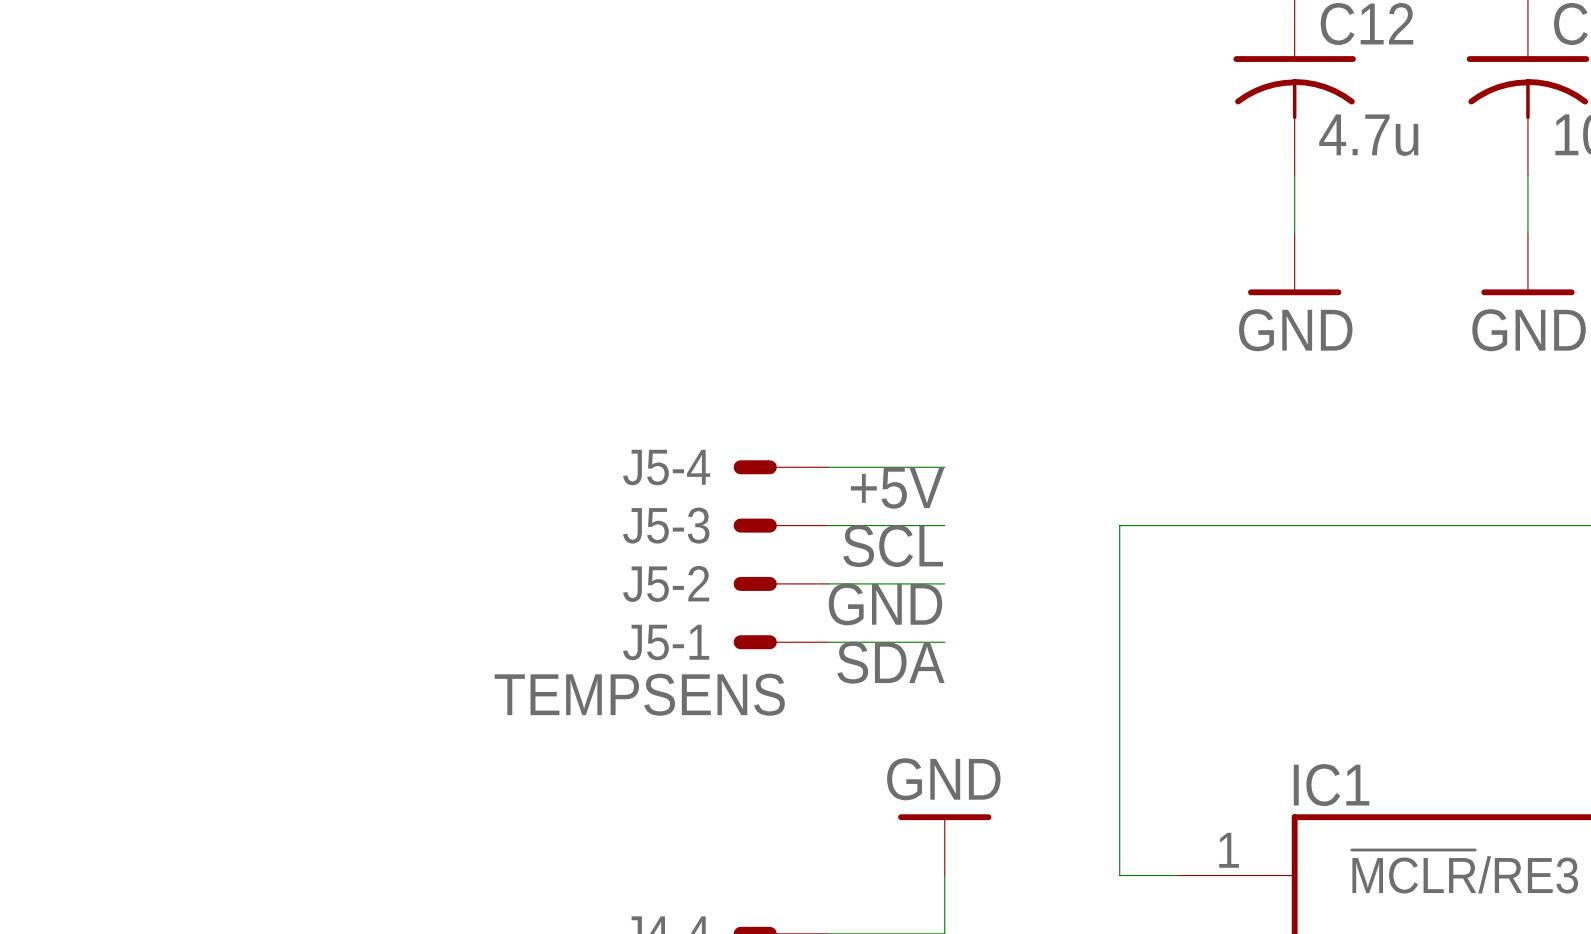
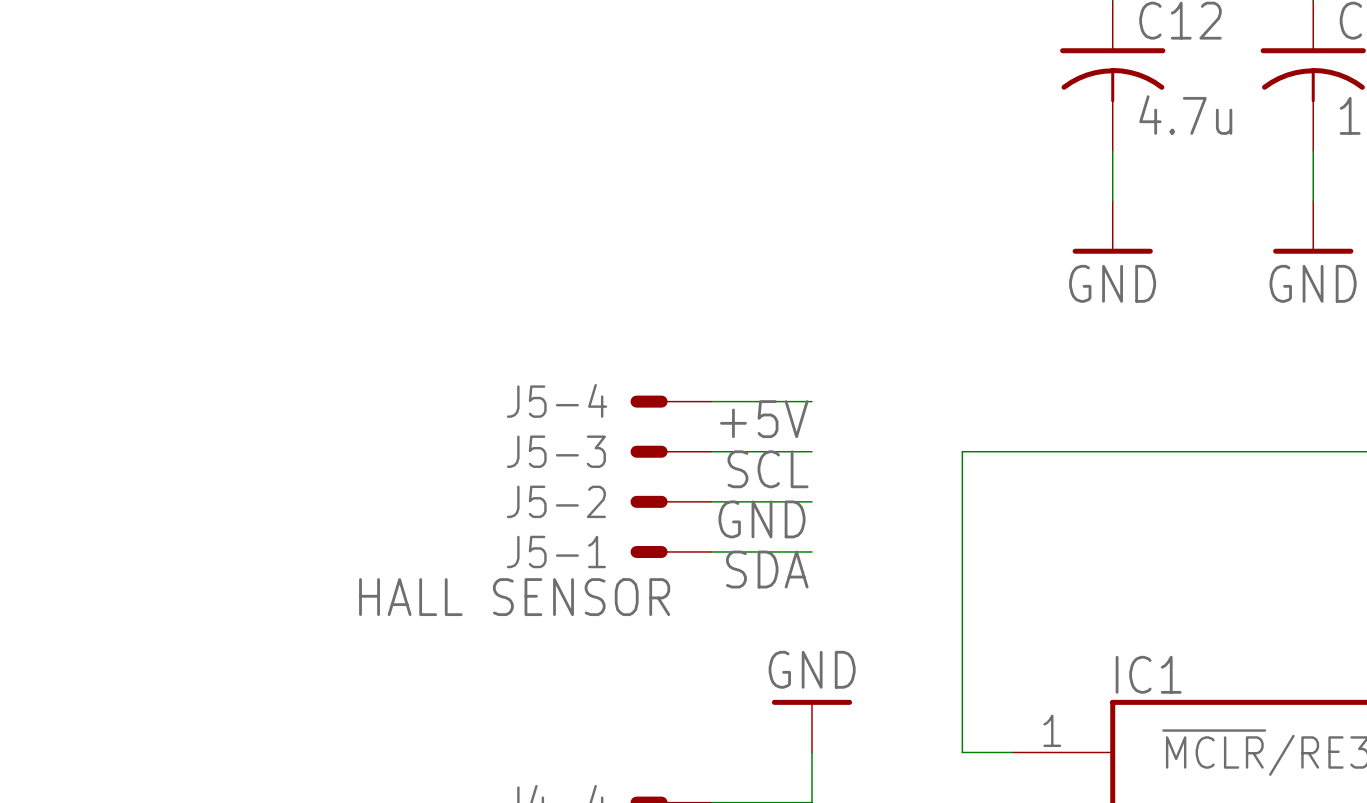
J5-1 value: TEMPSENS (639, 694) -> HALL SENSOR (514, 597)

